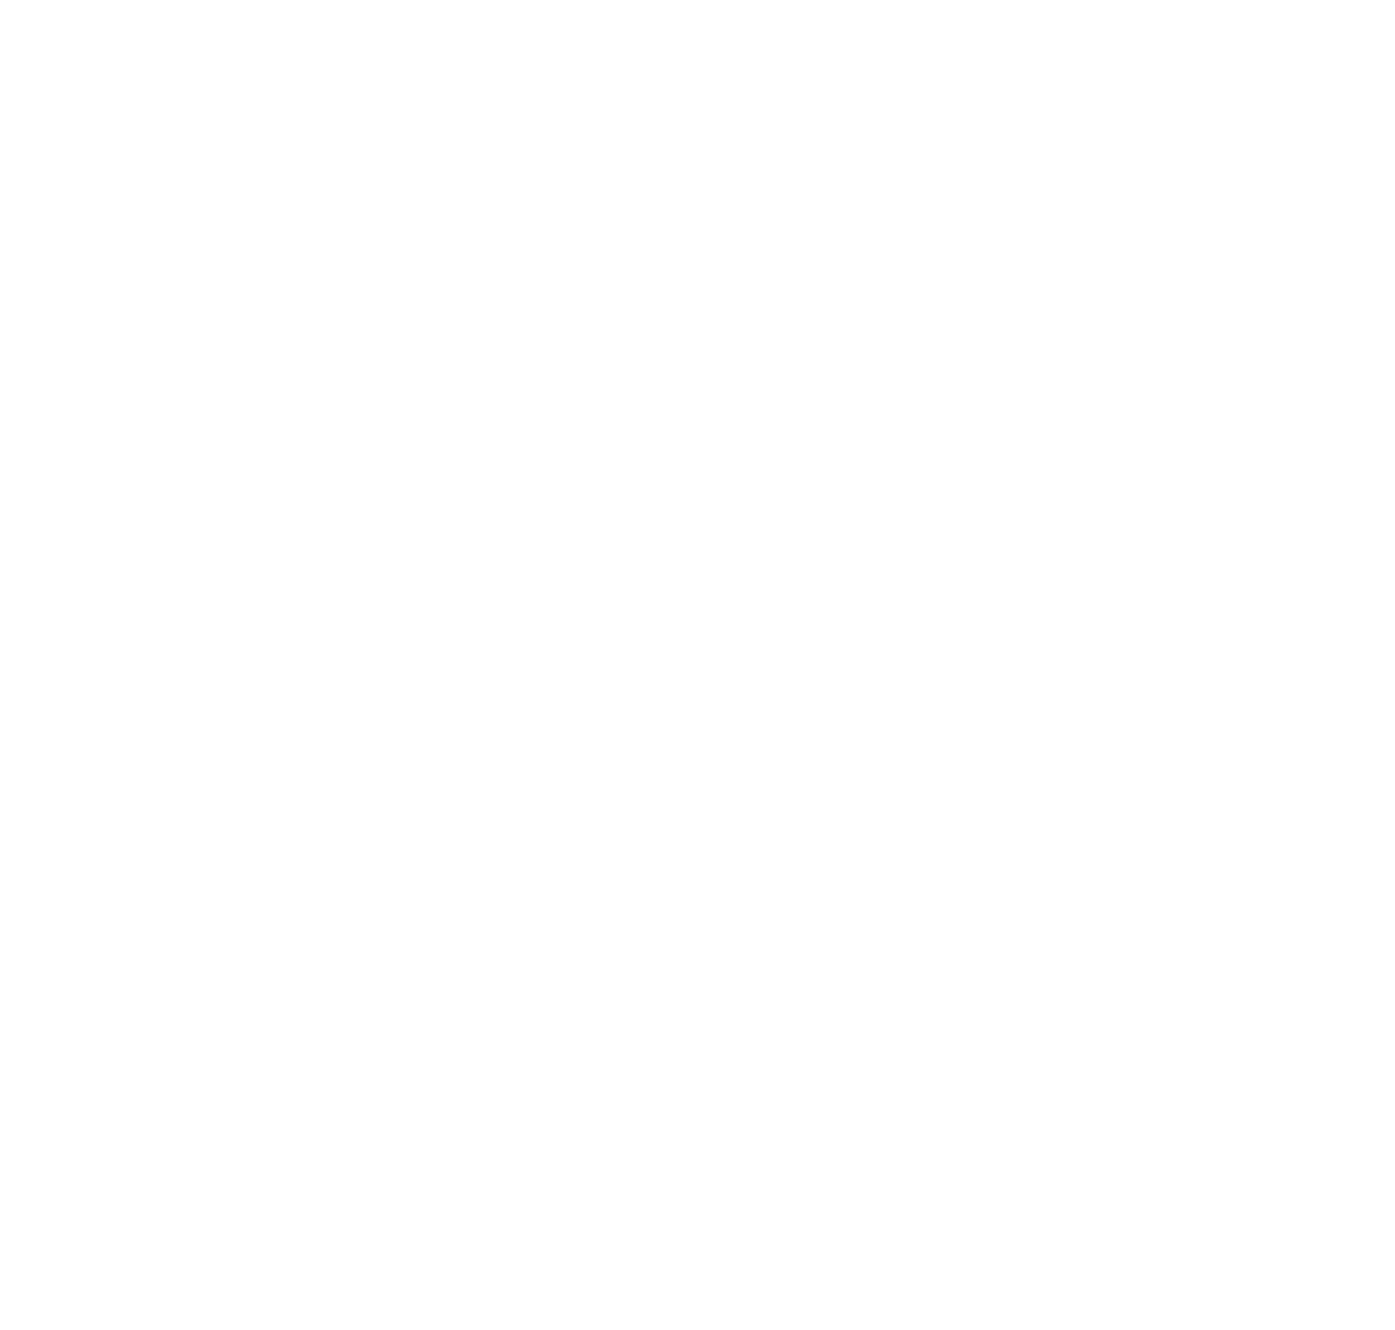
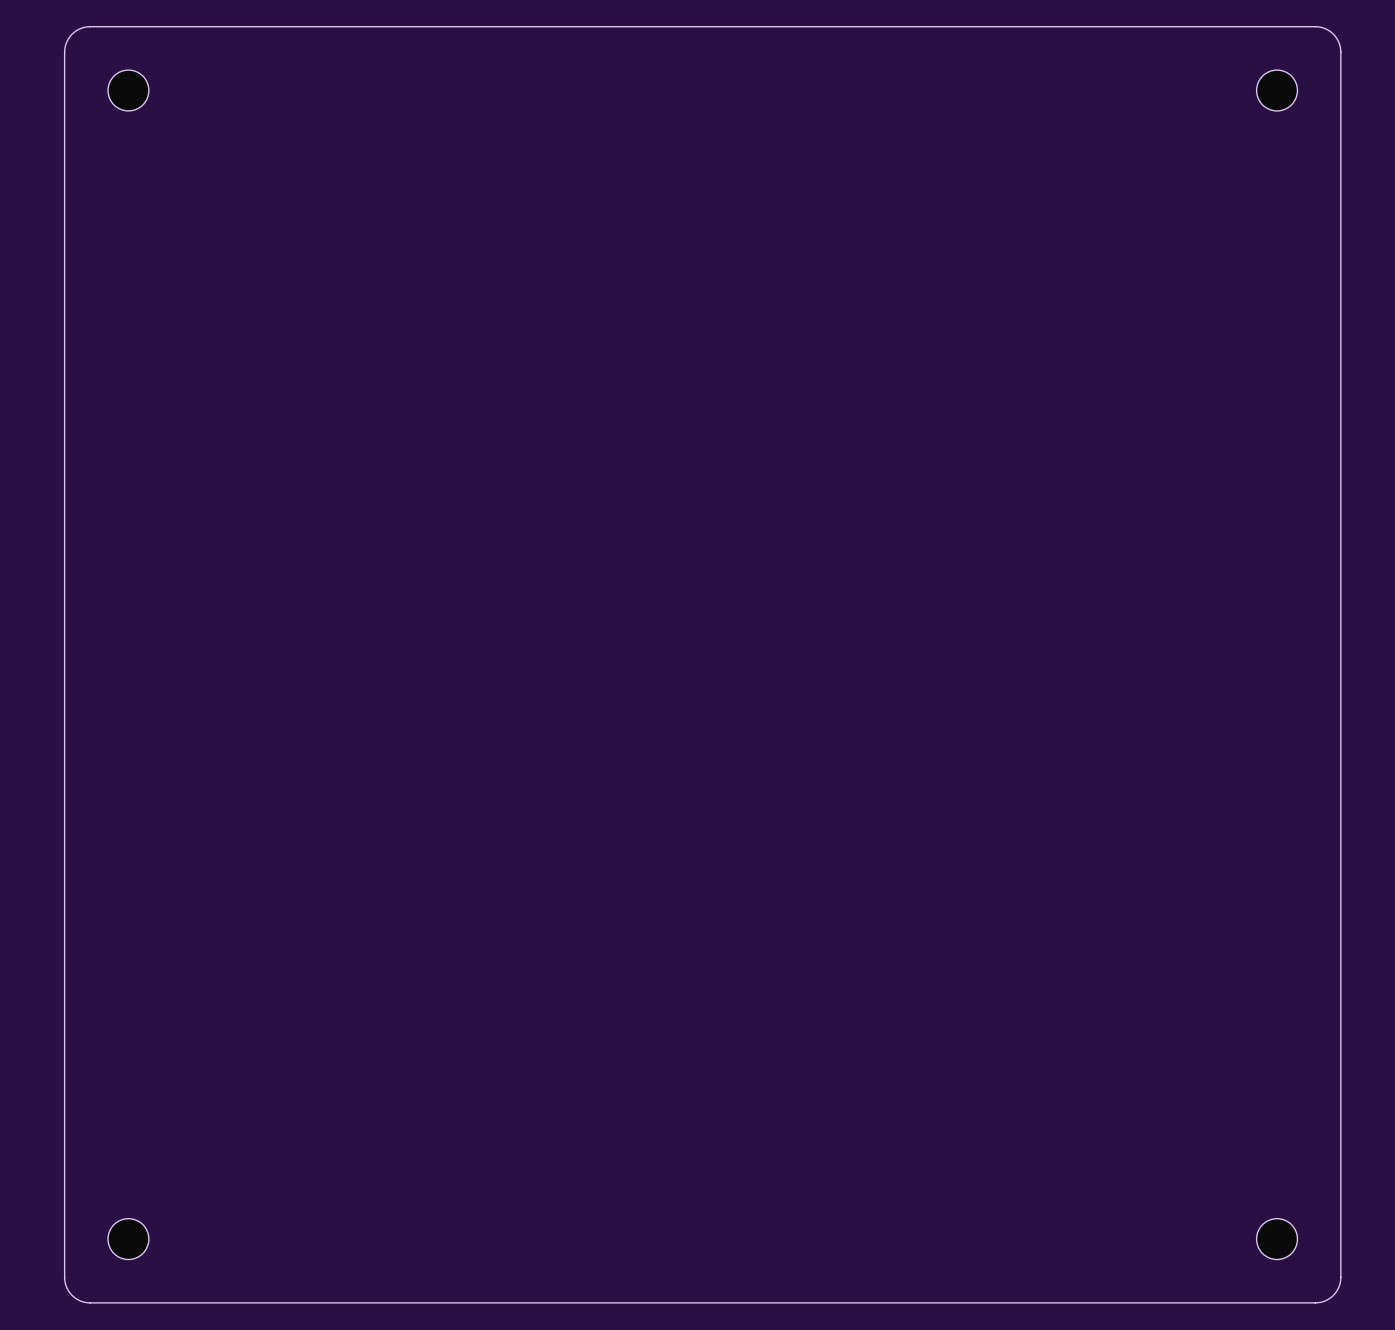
board edge: none -> (1315, 26) (90, 26) (81, 28) (72, 34) (67, 41) (64, 52) (64, 1277) (67, 1288) (72, 1295) (79, 1300) (90, 1302) (1315, 1302) (1323, 1301) (1333, 1295) (1339, 1285) (1340, 1277) (1340, 52) (1338, 41) (1333, 34) (1326, 29) (1315, 26)
part: none -> (128, 90)
part: none -> (1277, 90)
part: none -> (128, 1239)
part: none -> (1277, 1239)

